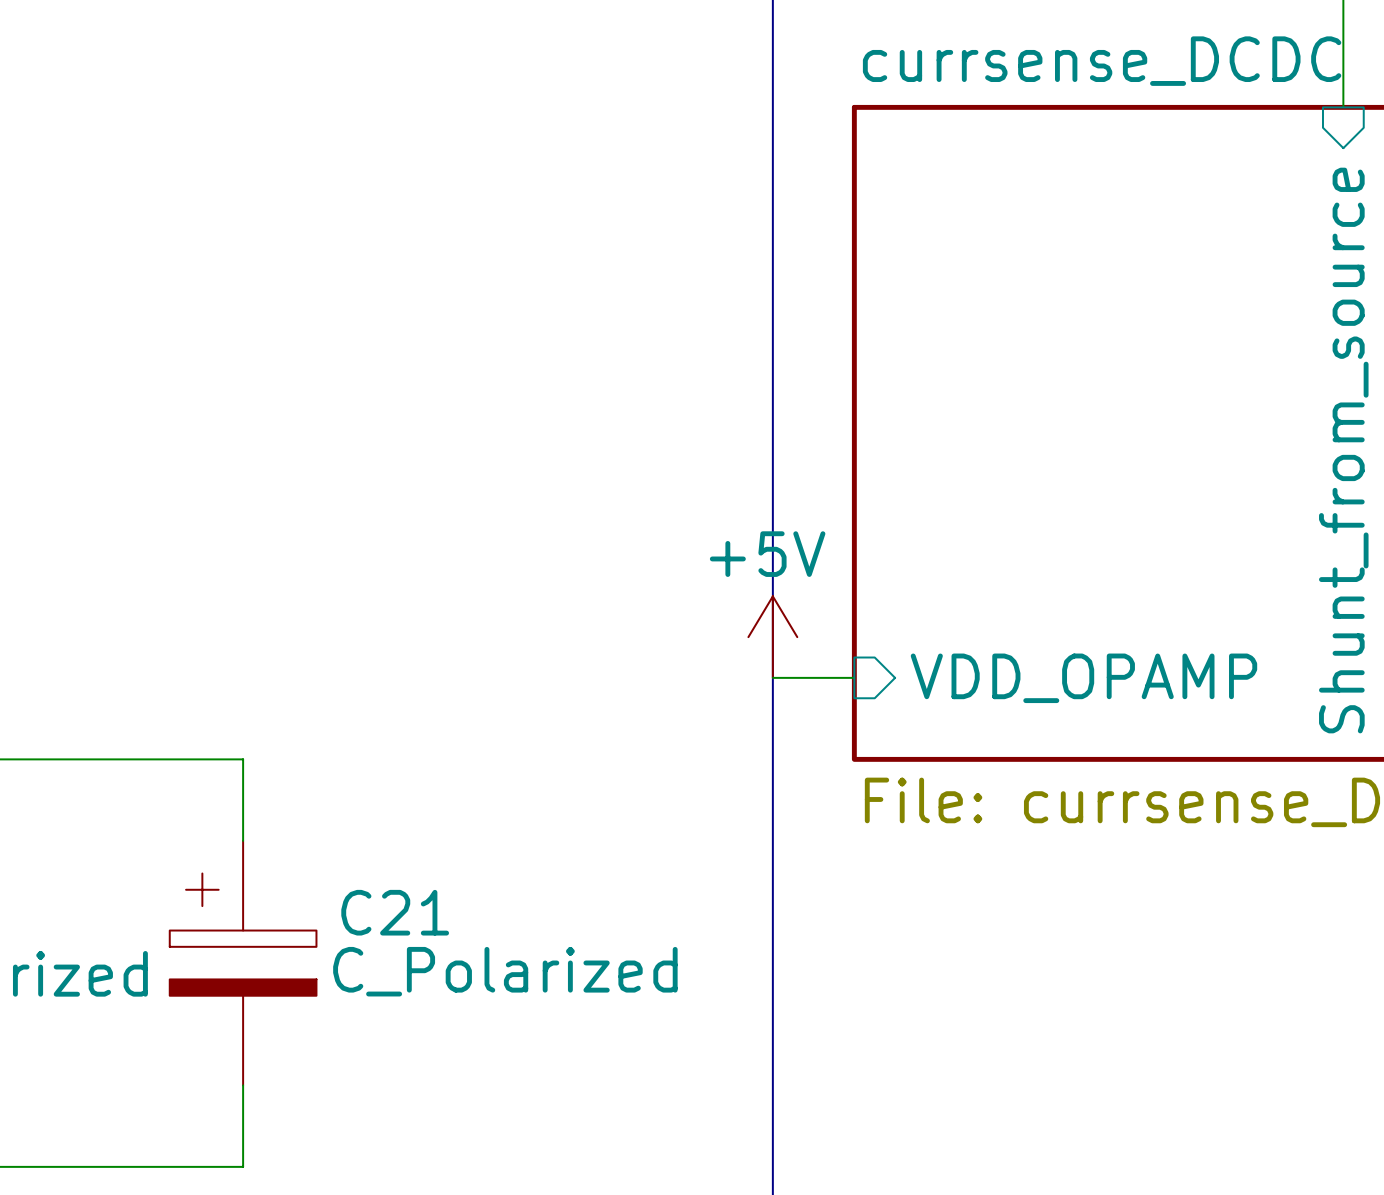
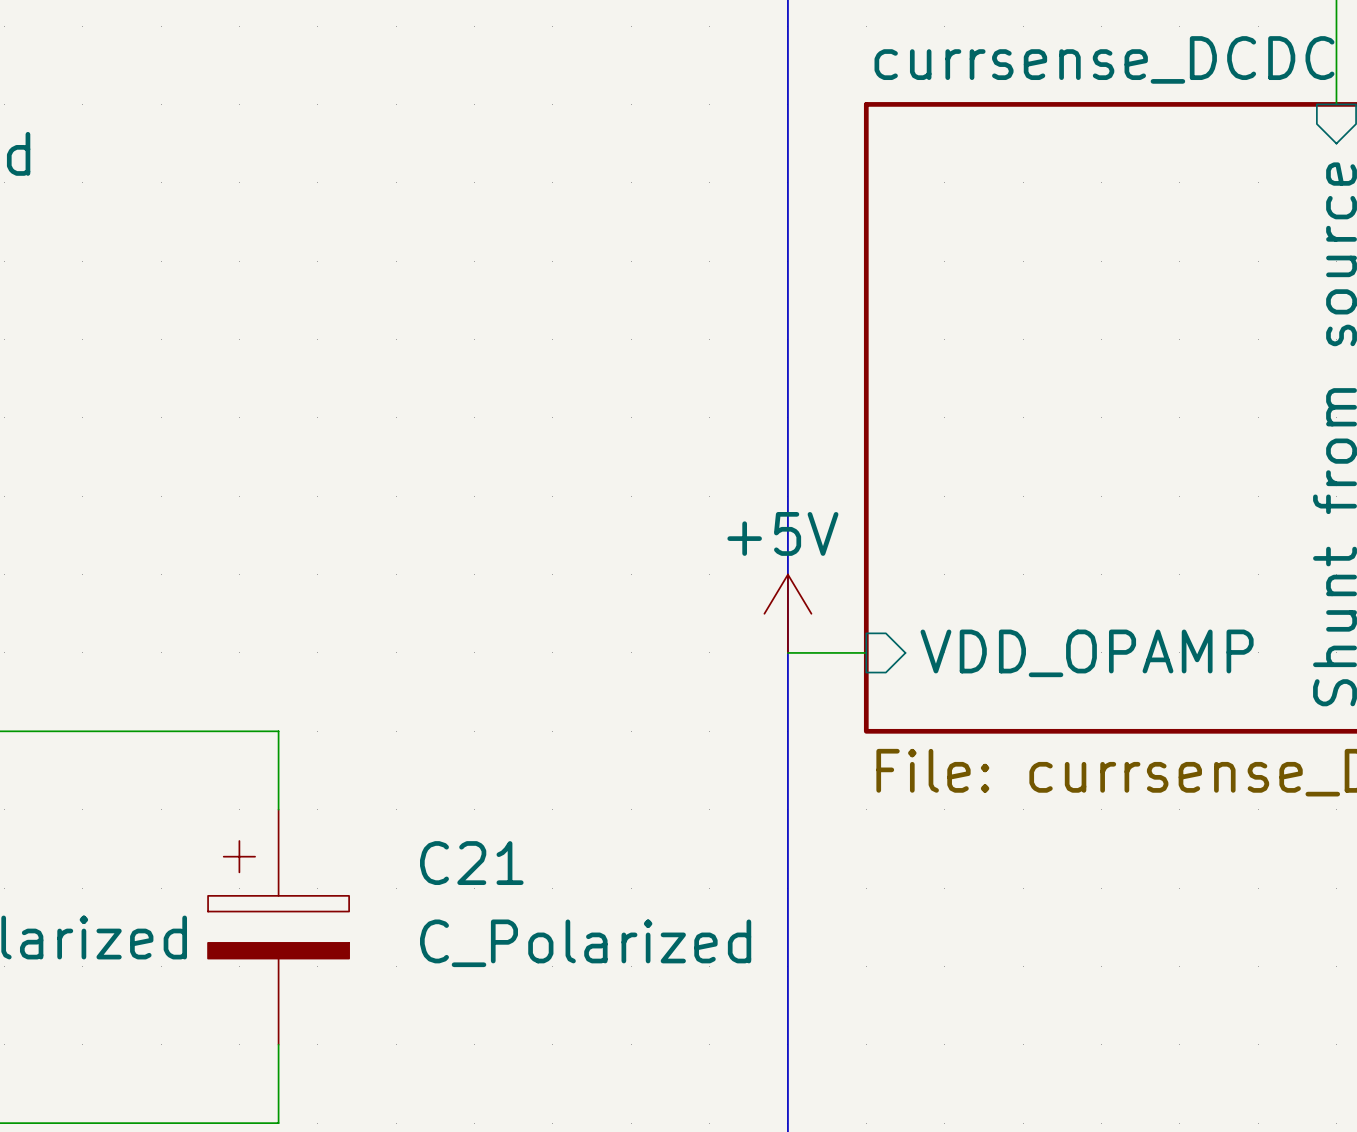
C21 name position: C21 (395, 912) -> C21 (471, 863)
C21 value position: C_Polarized (505, 971) -> C_Polarized (585, 943)

